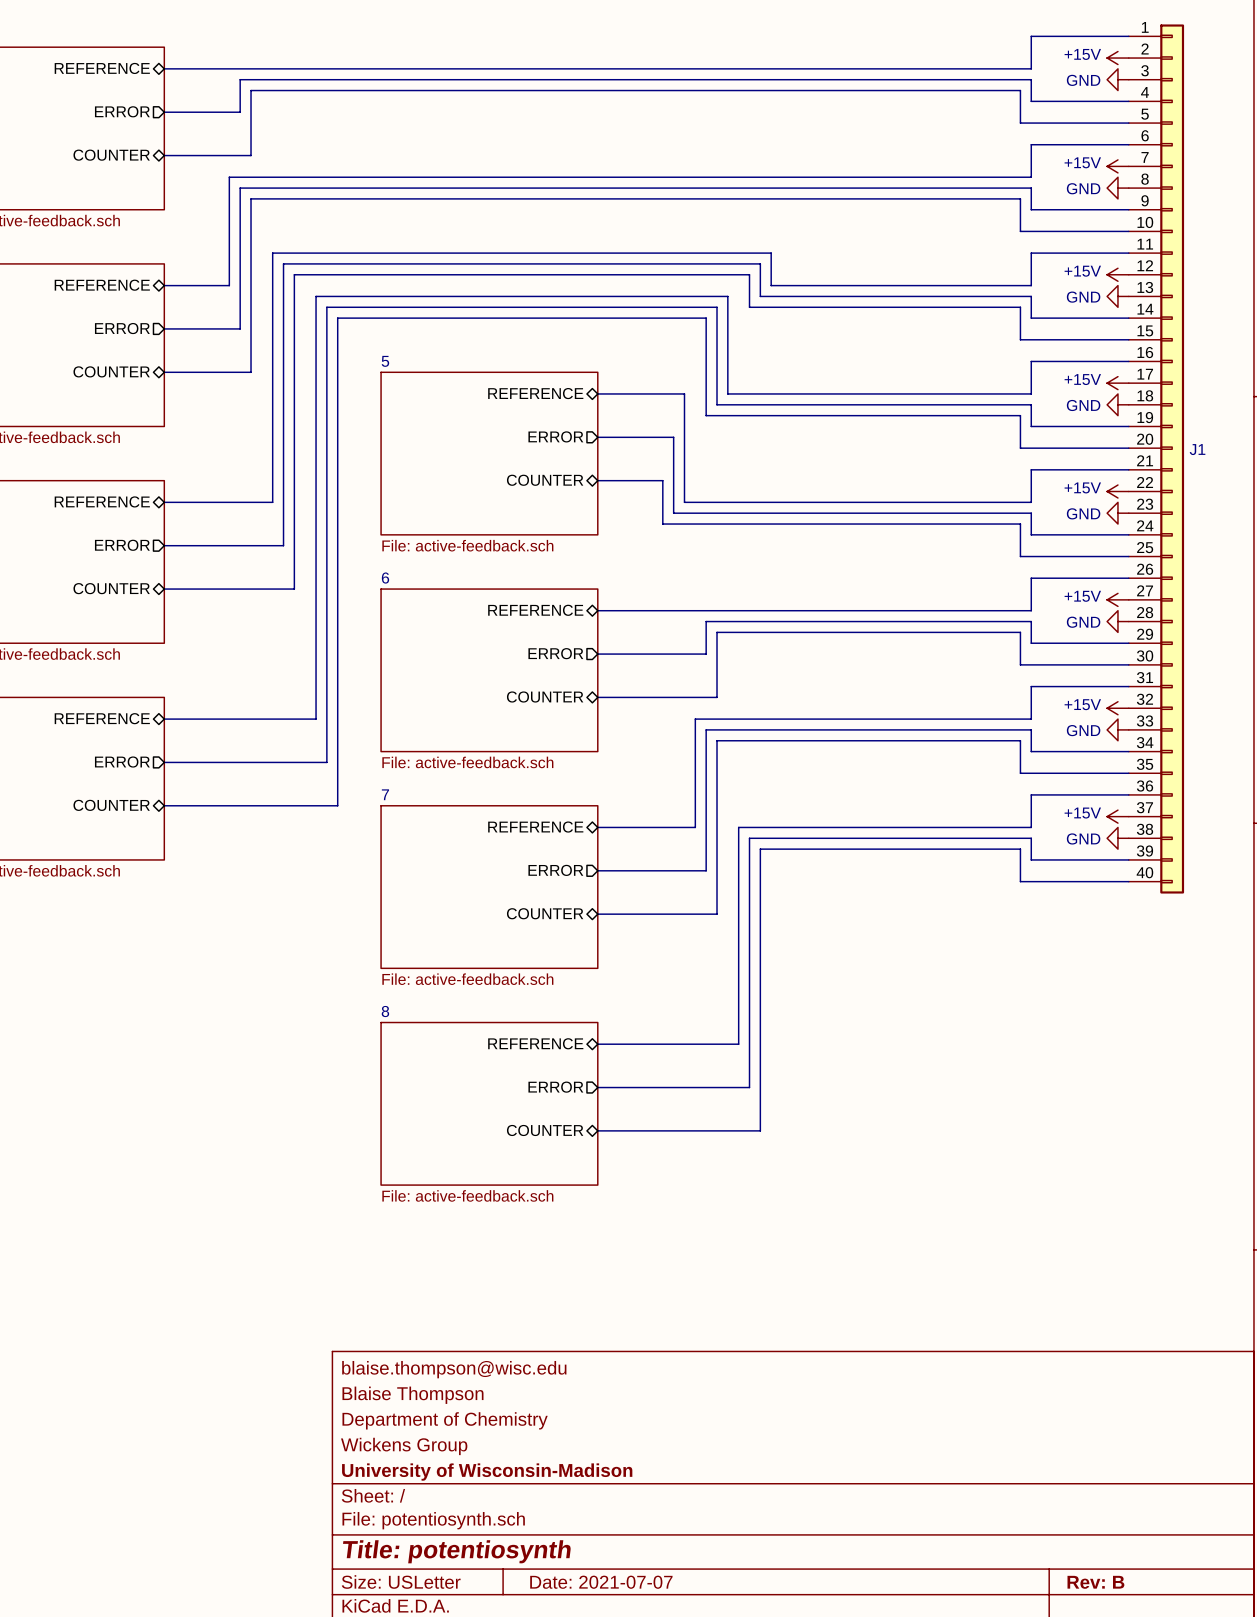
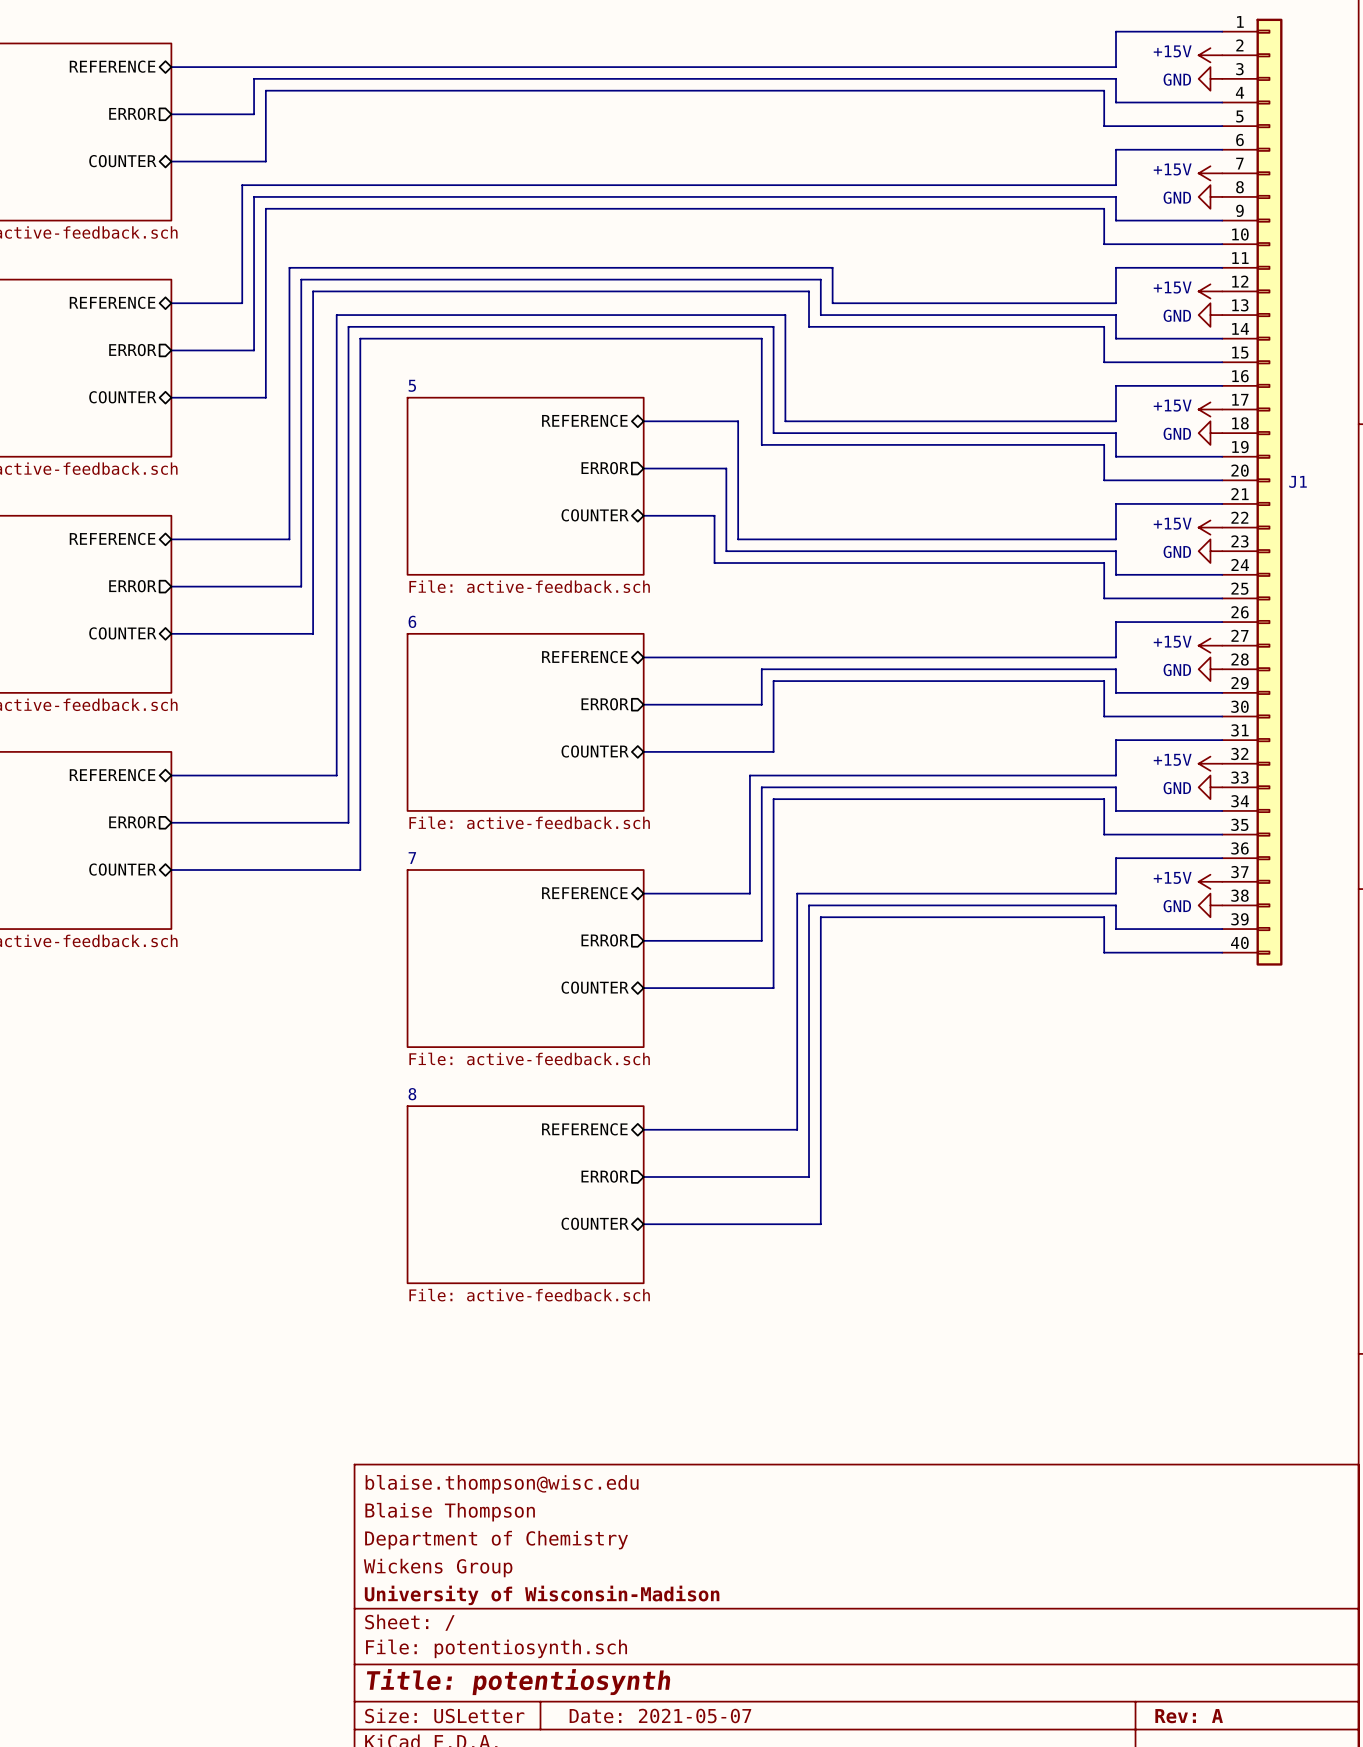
title block: Date: 2021-07-07 (601, 1582) -> Date: 2021-05-07 (660, 1716)
title block: Rev: B (1095, 1582) -> Rev: A (1189, 1716)

